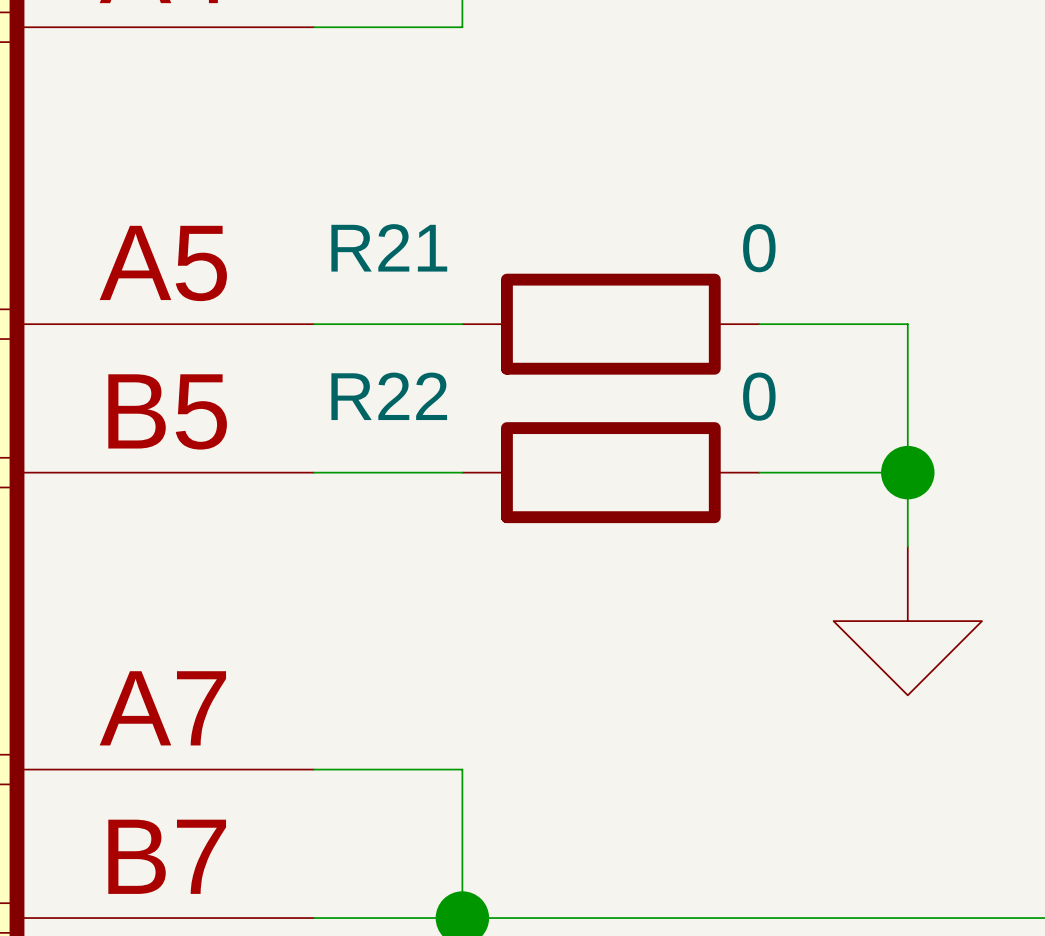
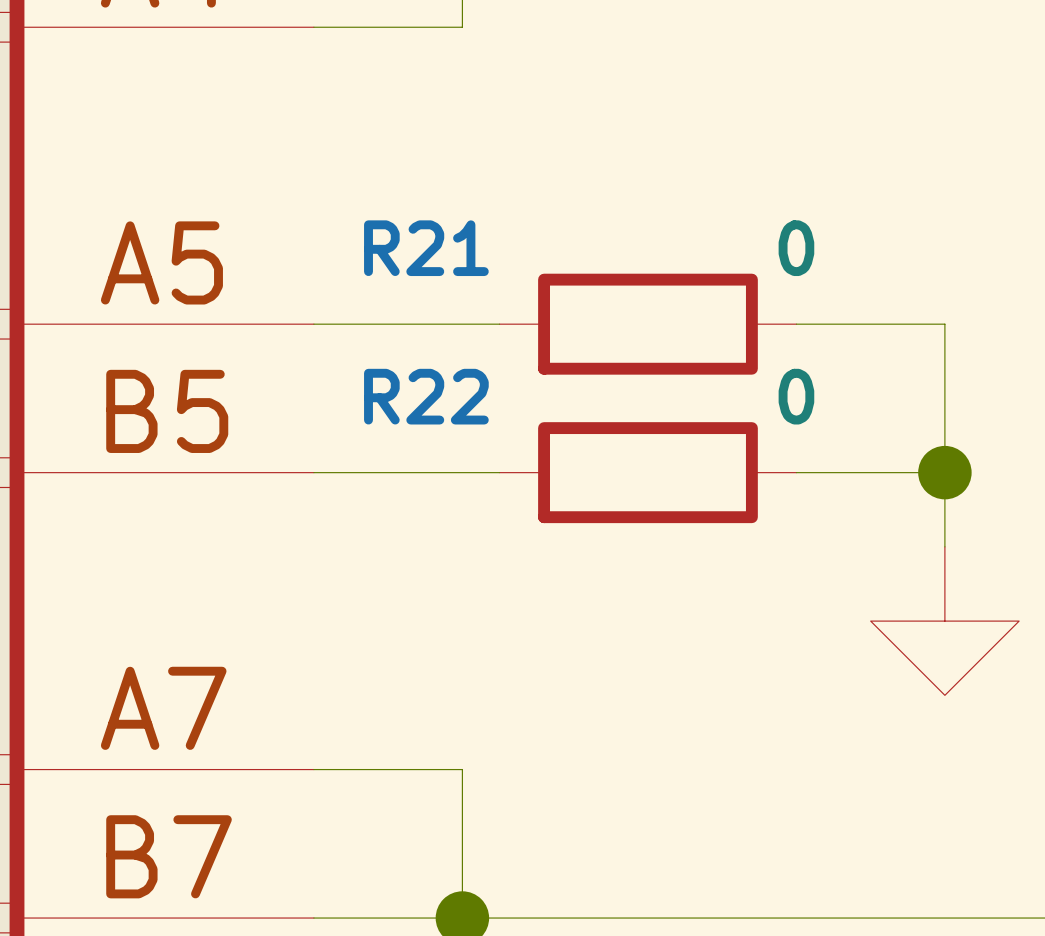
R21 position: (610, 324) -> (647, 324)
wire: (907, 324) (907, 546) -> (907, 324) (944, 324) (944, 546)
R22 position: (610, 472) -> (647, 472)
junction position: (907, 472) -> (944, 472)
power symbol position: (907, 621) -> (944, 621)

